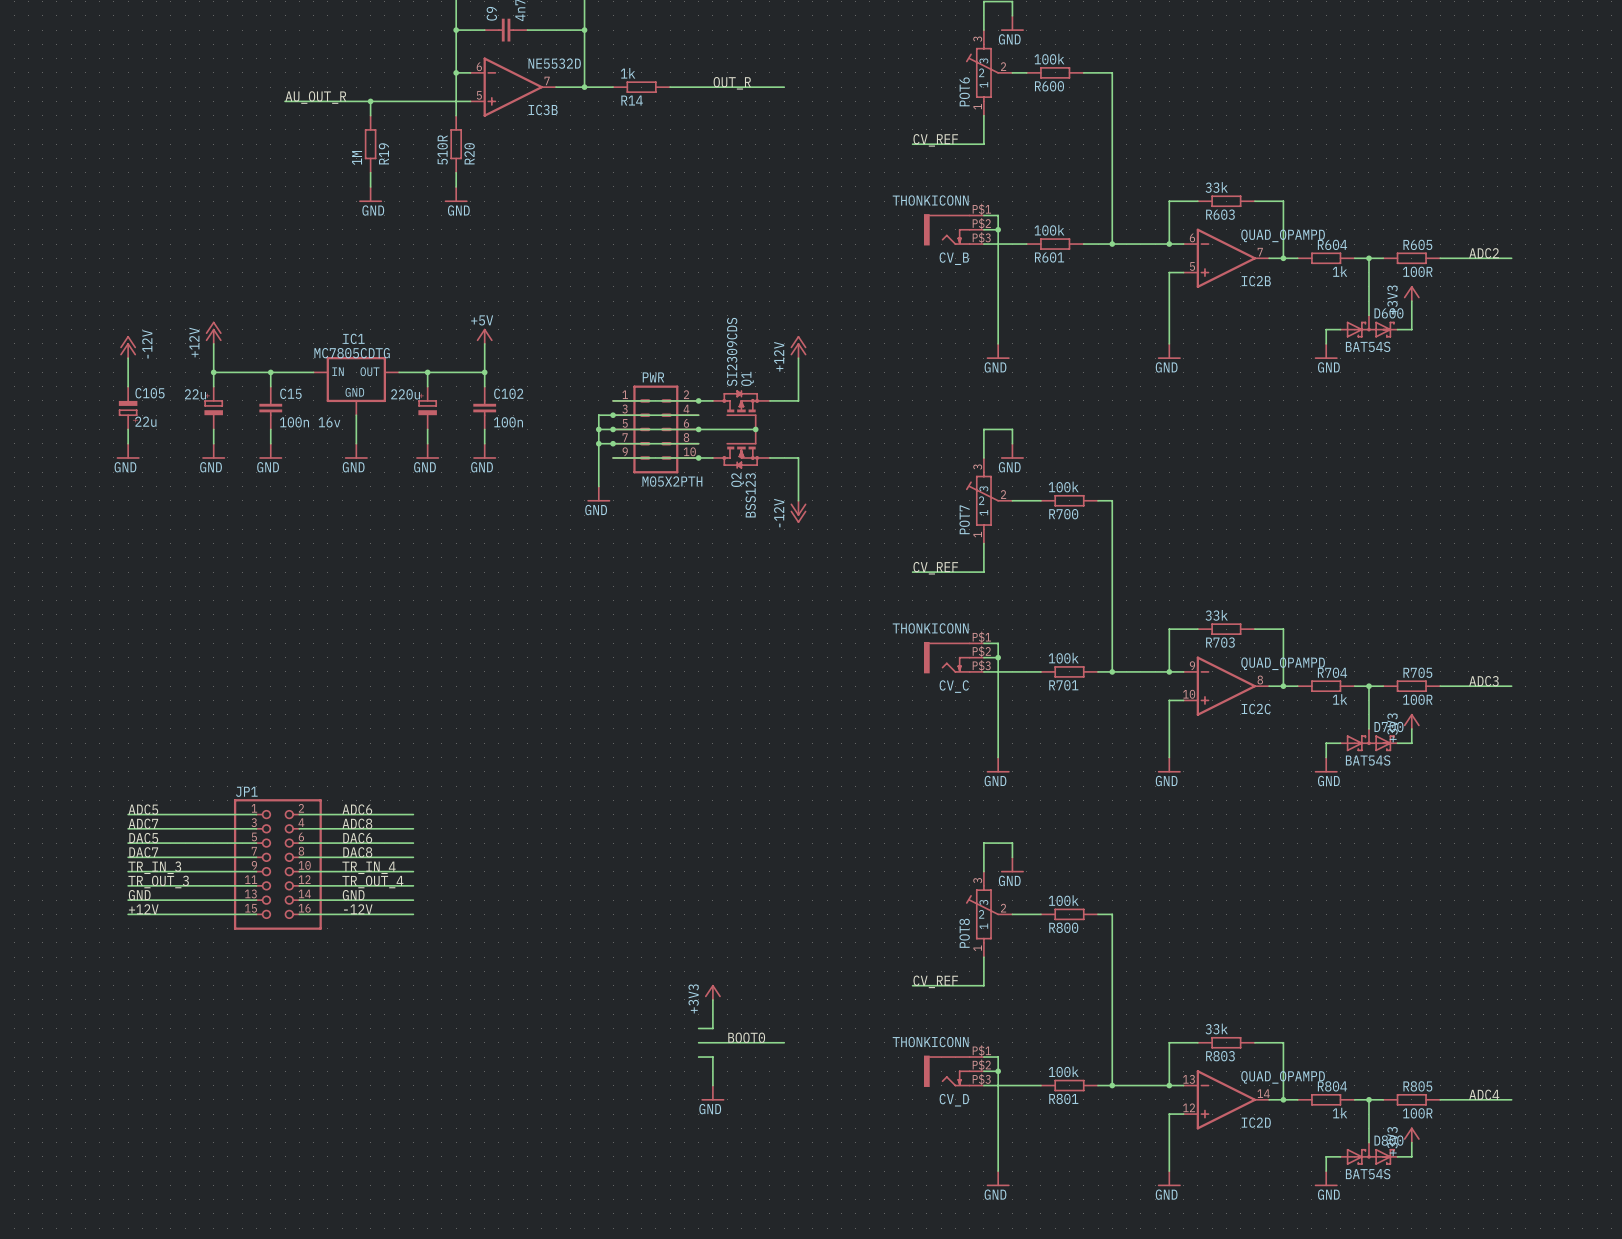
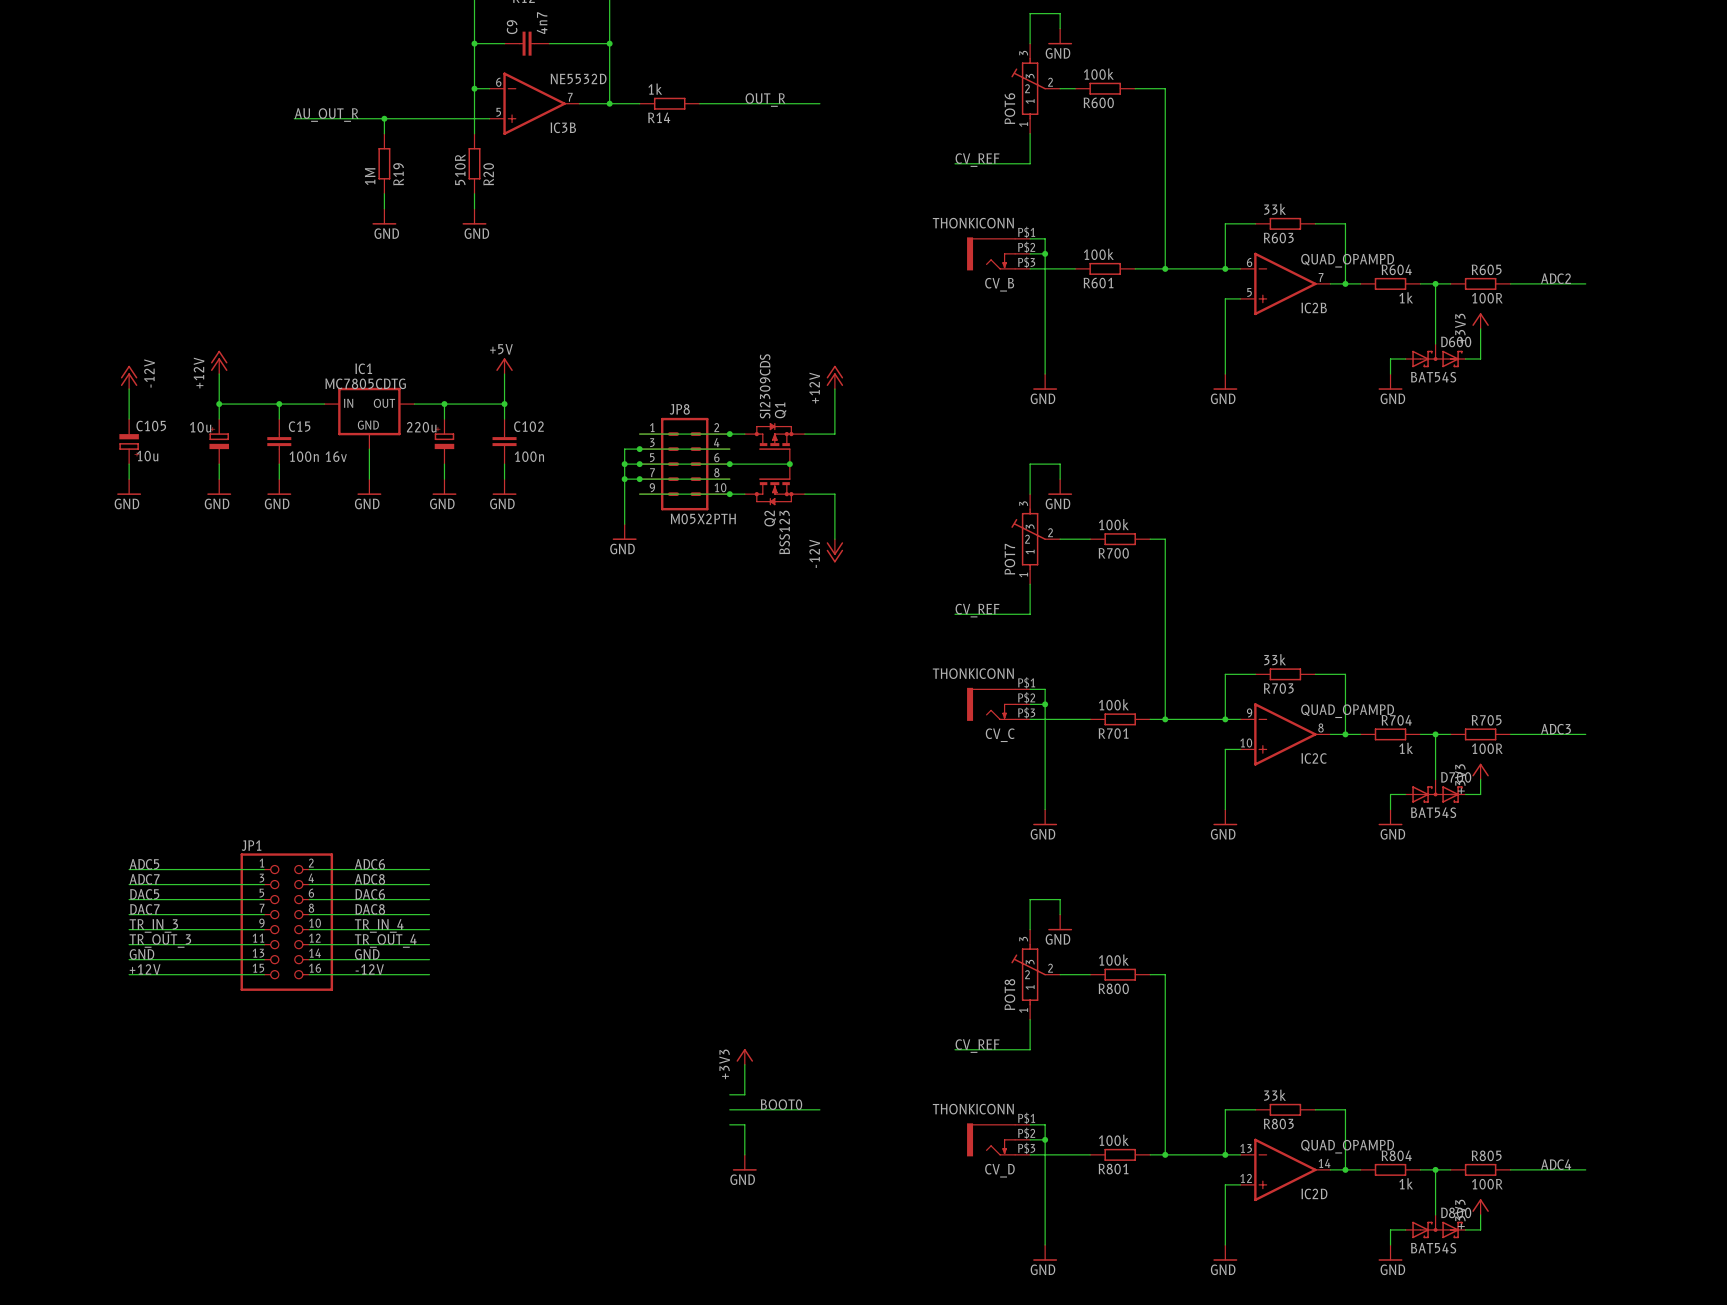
PWR name: PWR (653, 377) -> JP8 (679, 409)
part value: 22u (195, 394) -> 10u (200, 427)
C105 value: 22u (145, 421) -> 10u (147, 456)

